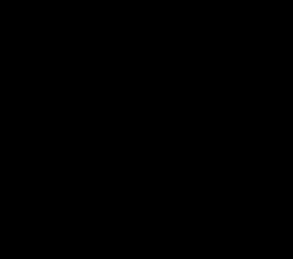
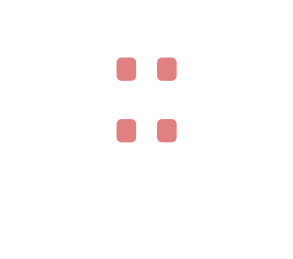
part: none -> (146, 69)
part: none -> (146, 130)

